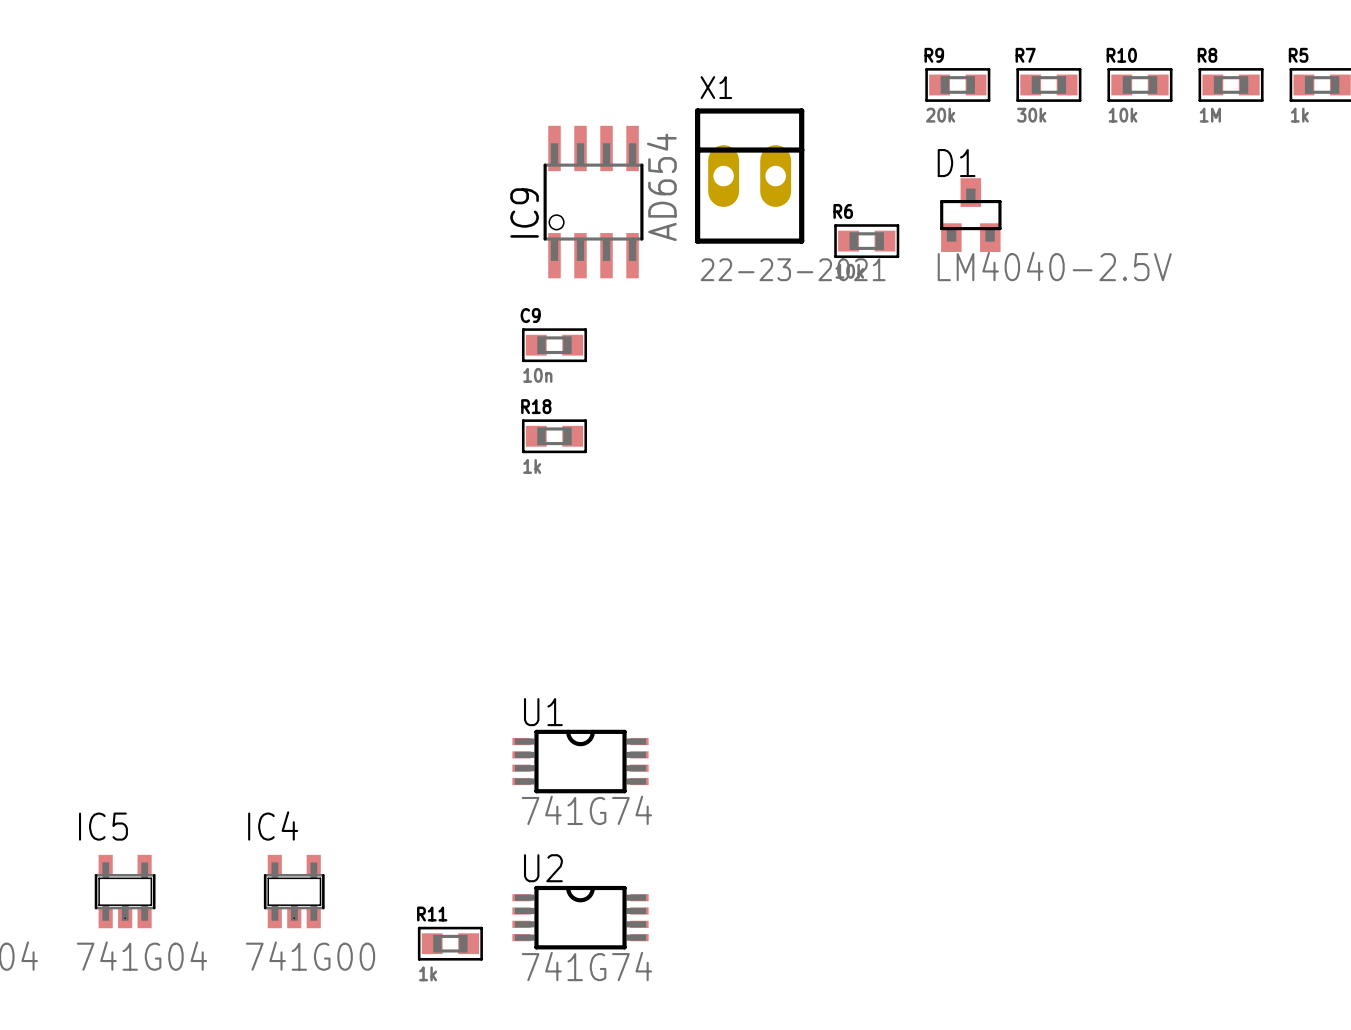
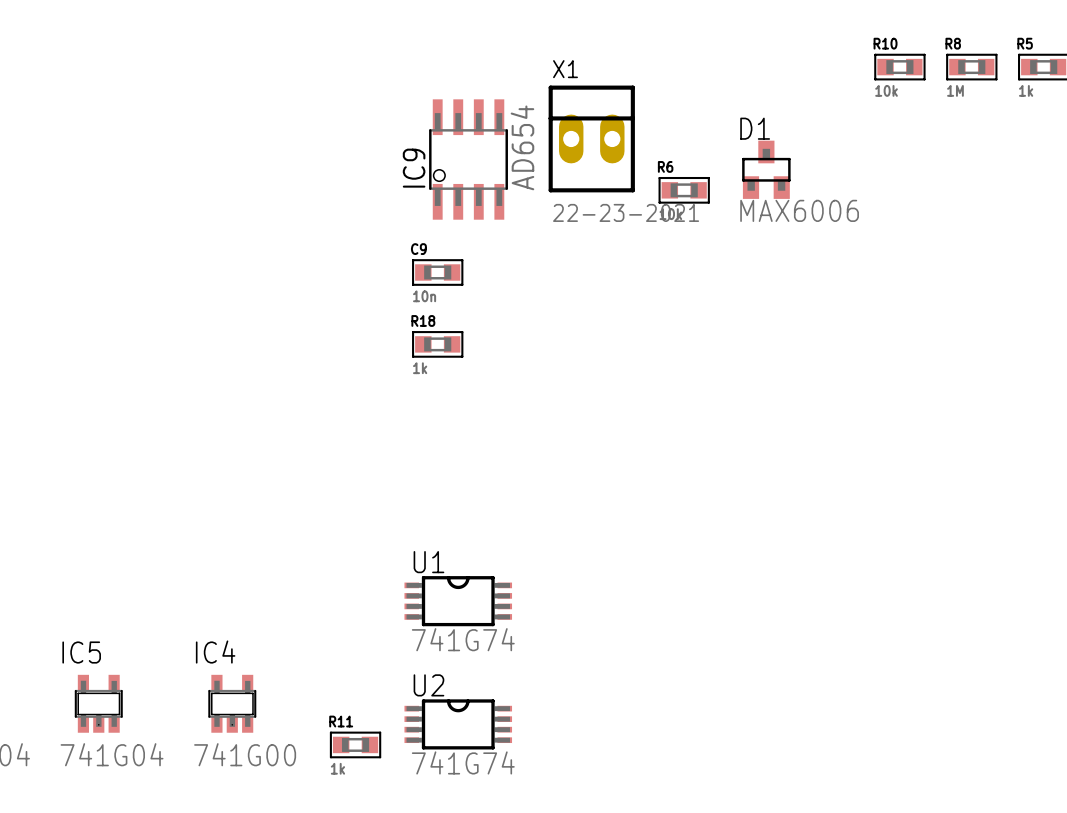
R9: 20k (957, 84) -> none
R7: 30k (1048, 84) -> none
D1 value: LM4040-2.5V (1054, 266) -> MAX6006 (799, 210)

